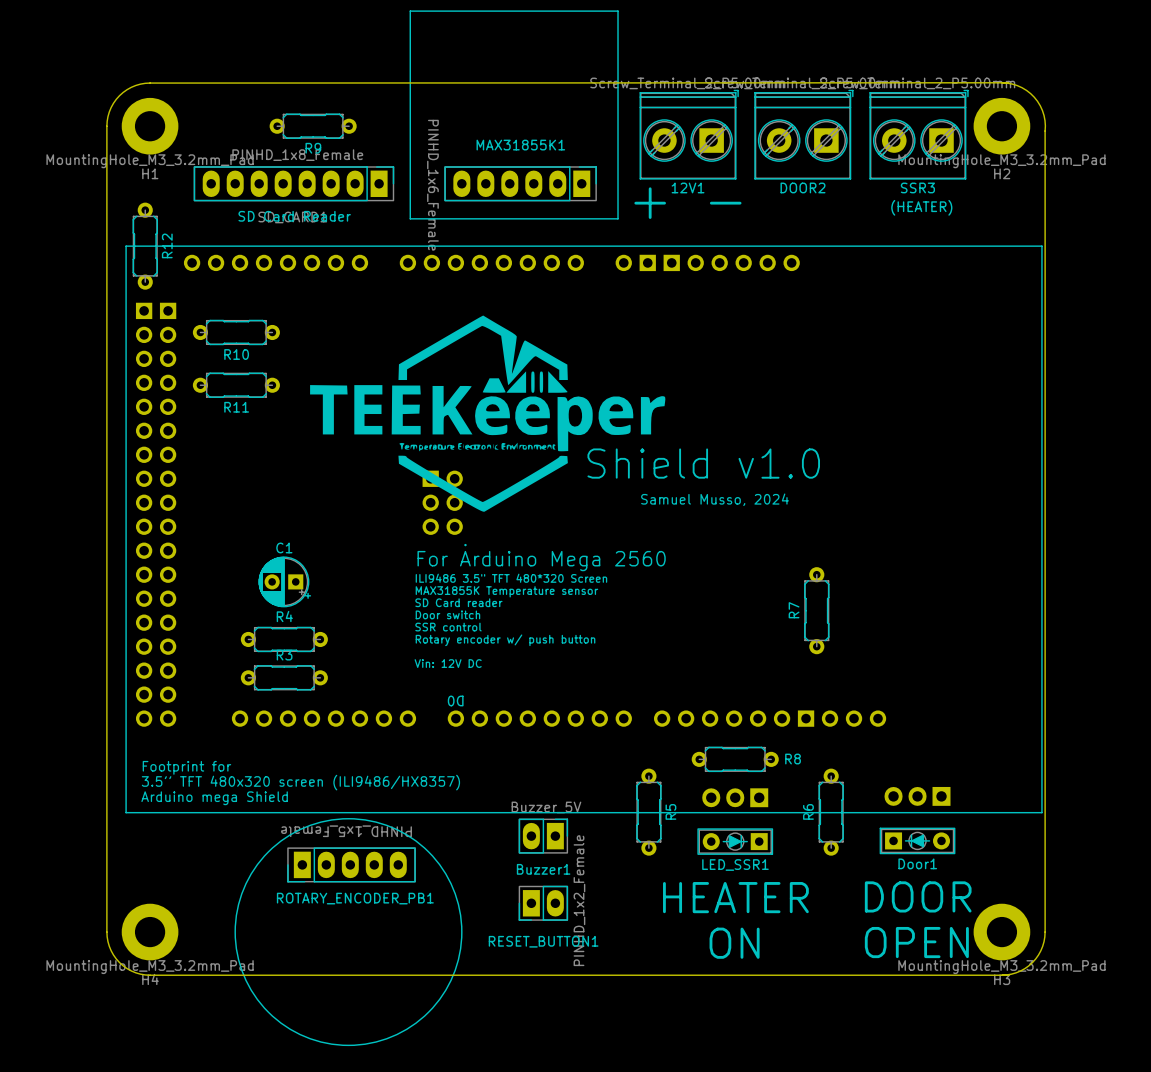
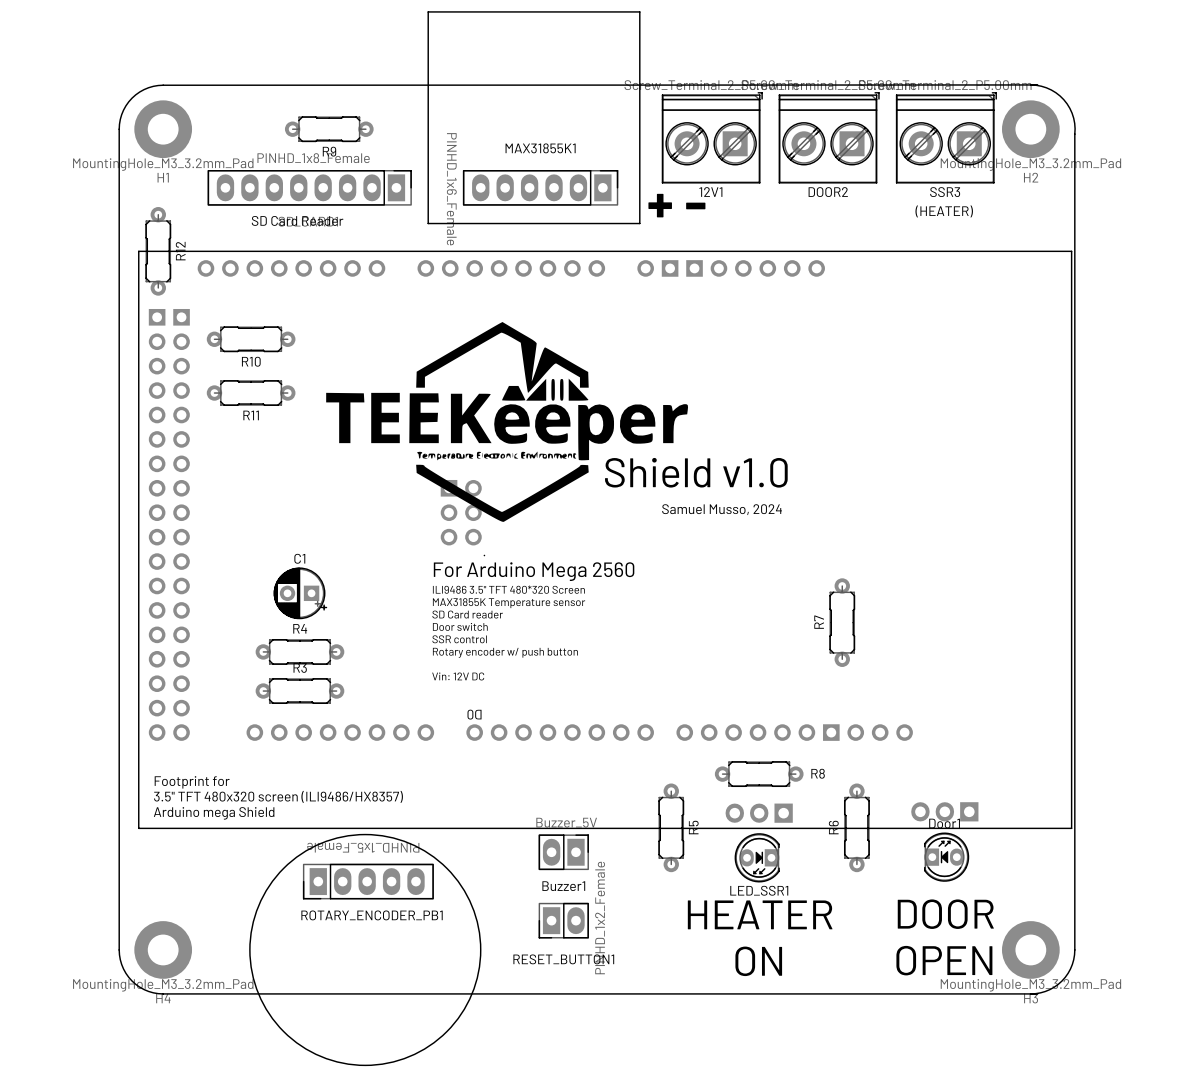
Door1 footprint: [879, 827, 956, 855] -> [924, 832, 970, 882]
LED_SSR1 footprint: [697, 828, 773, 855] -> [734, 833, 780, 883]
Door1 name position: Door1 (917, 863) -> Door1 (944, 823)

